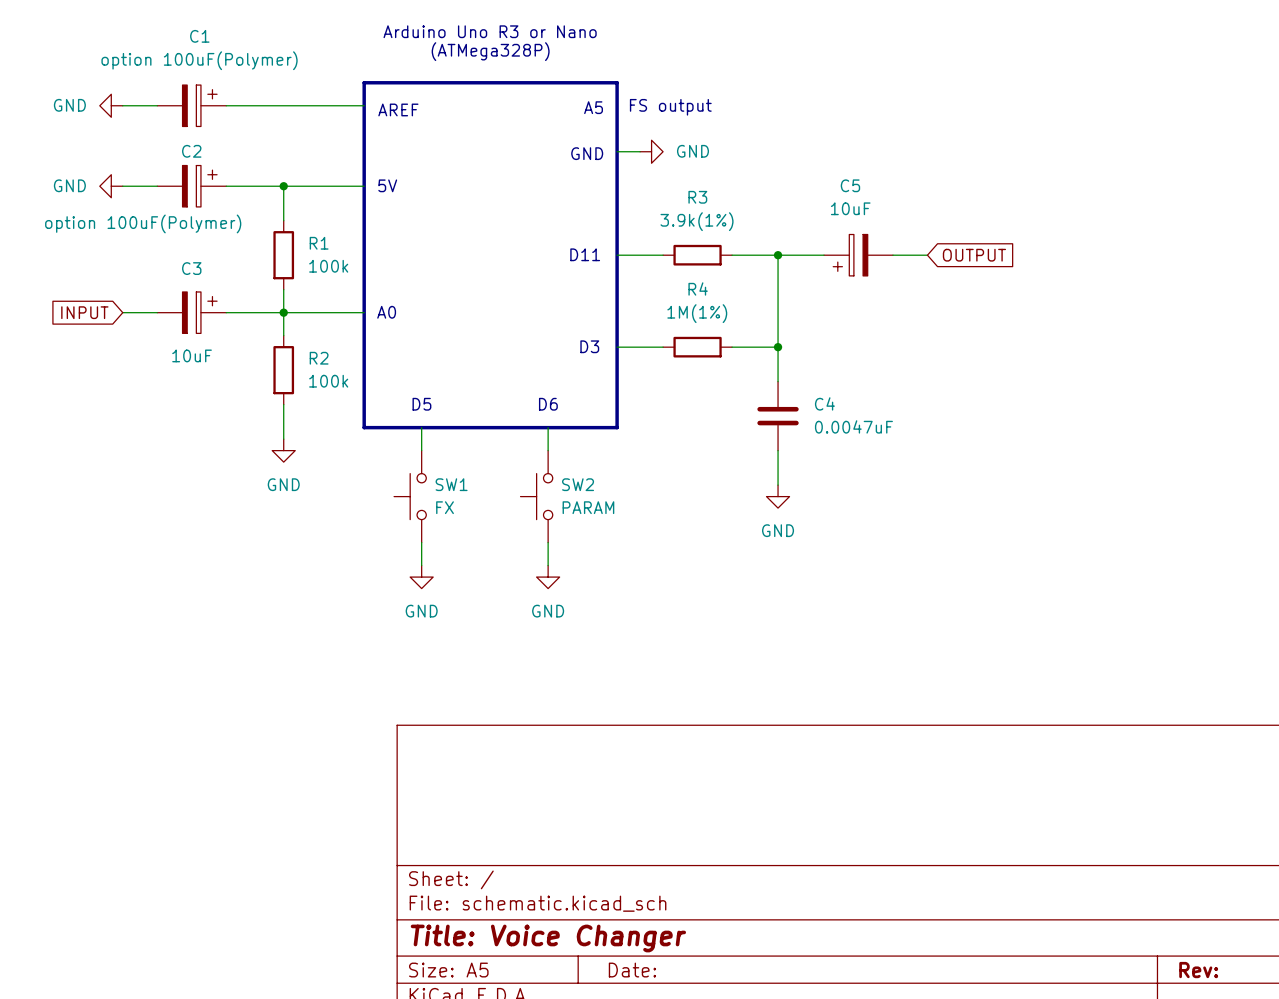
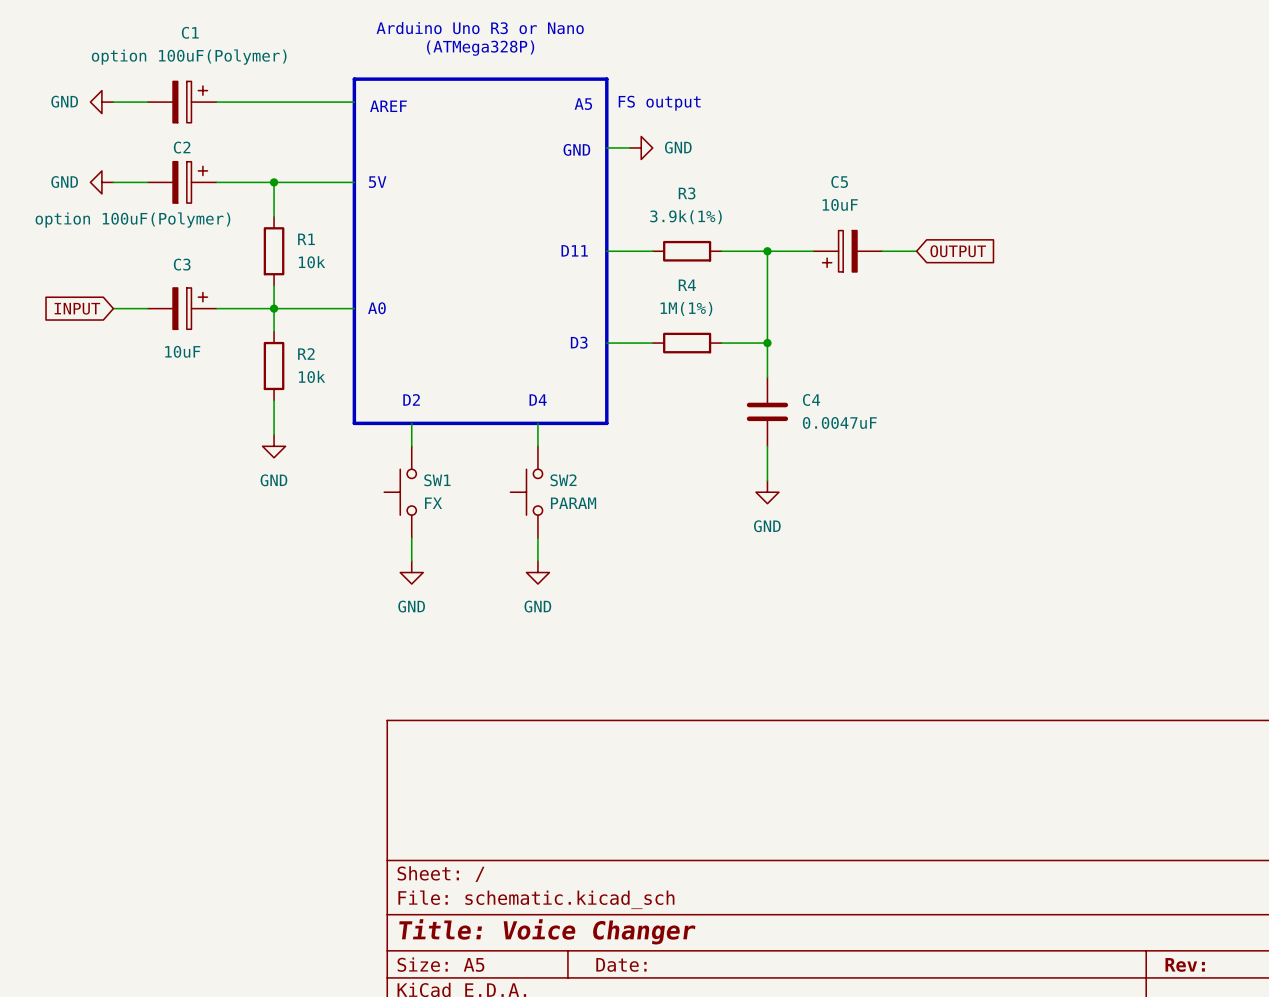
R1 value: 100k (328, 266) -> 10k (312, 262)
R2 value: 100k (328, 381) -> 10k (312, 376)
text: D5 (421, 404) -> D2 (411, 399)
text: D6 (548, 404) -> D4 (538, 400)

